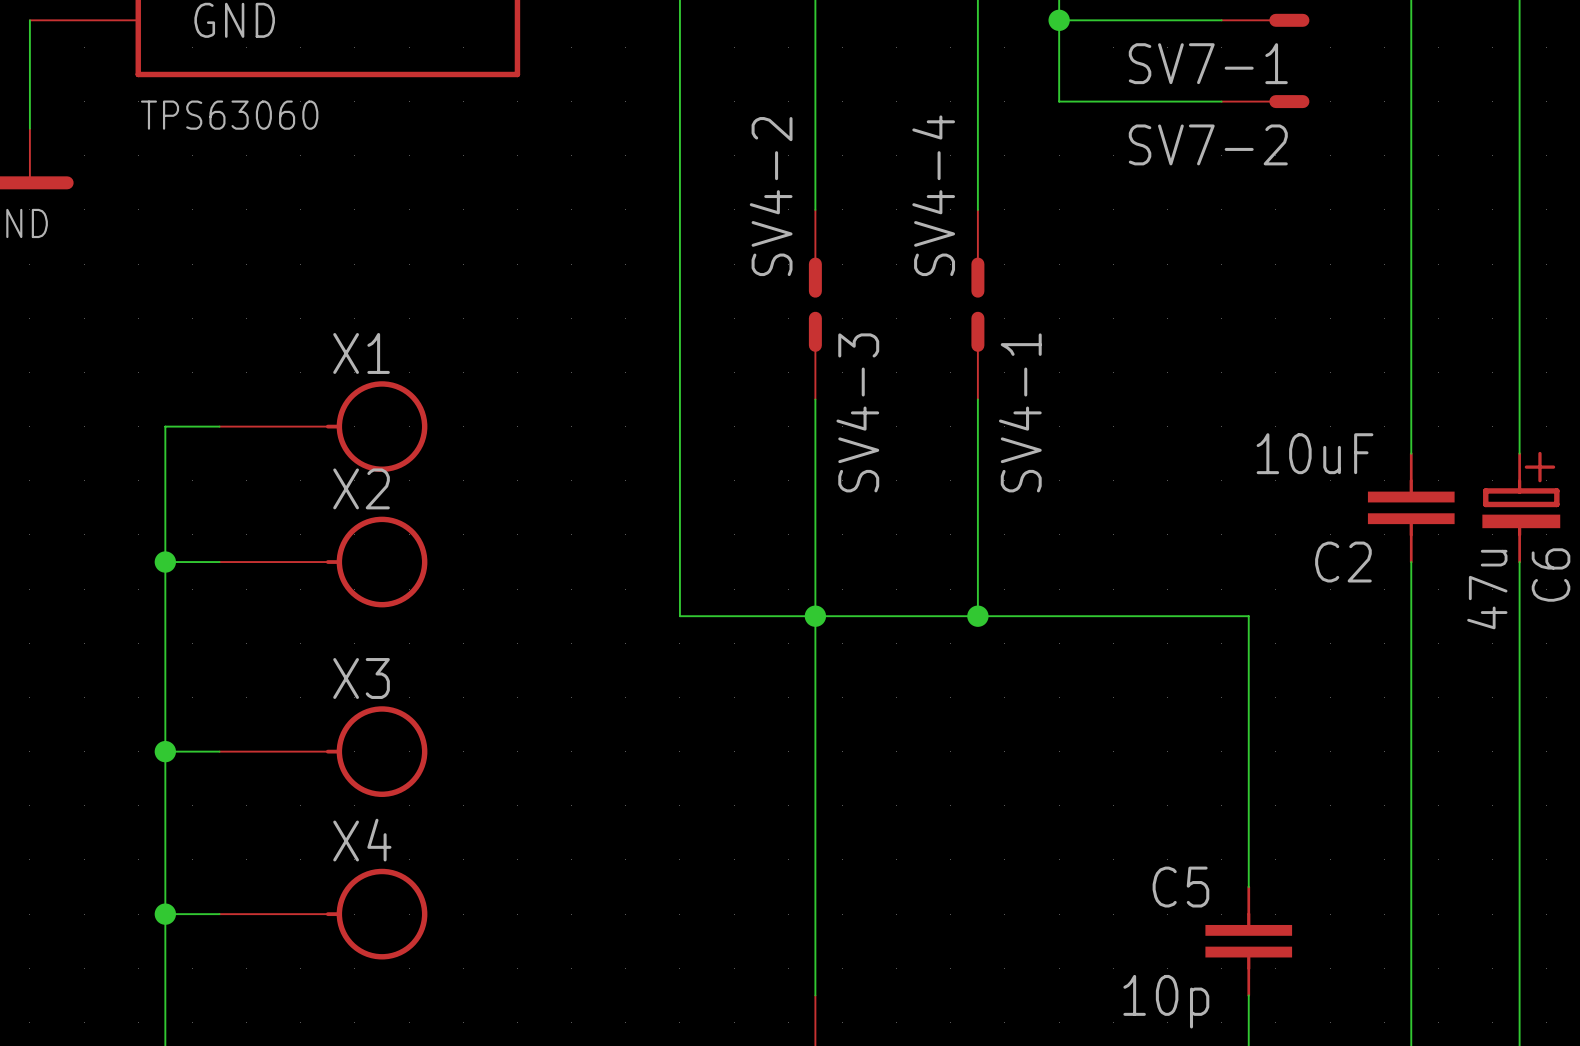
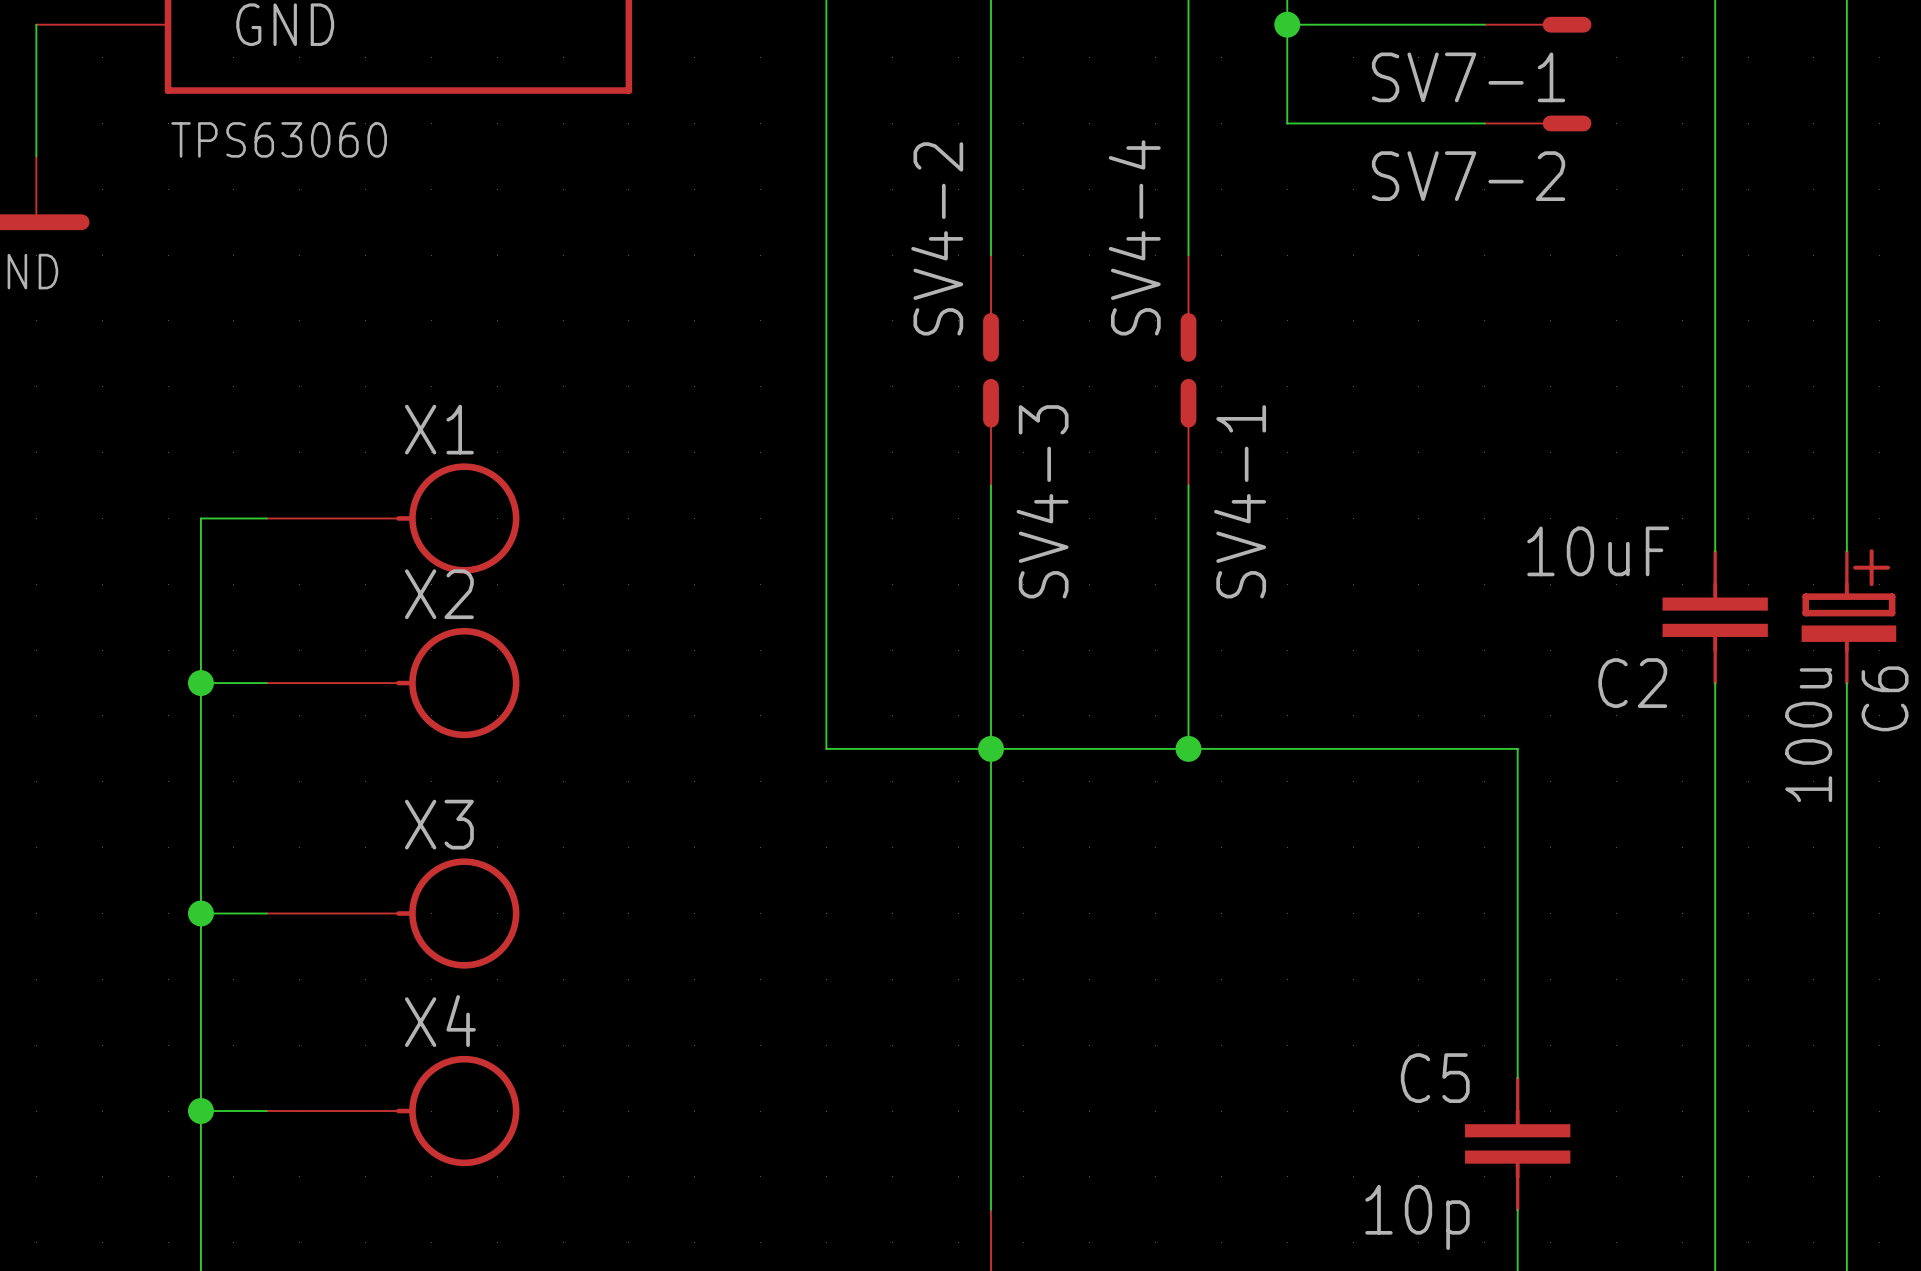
C6 value: 47u (1487, 589) -> 100u (1808, 735)

